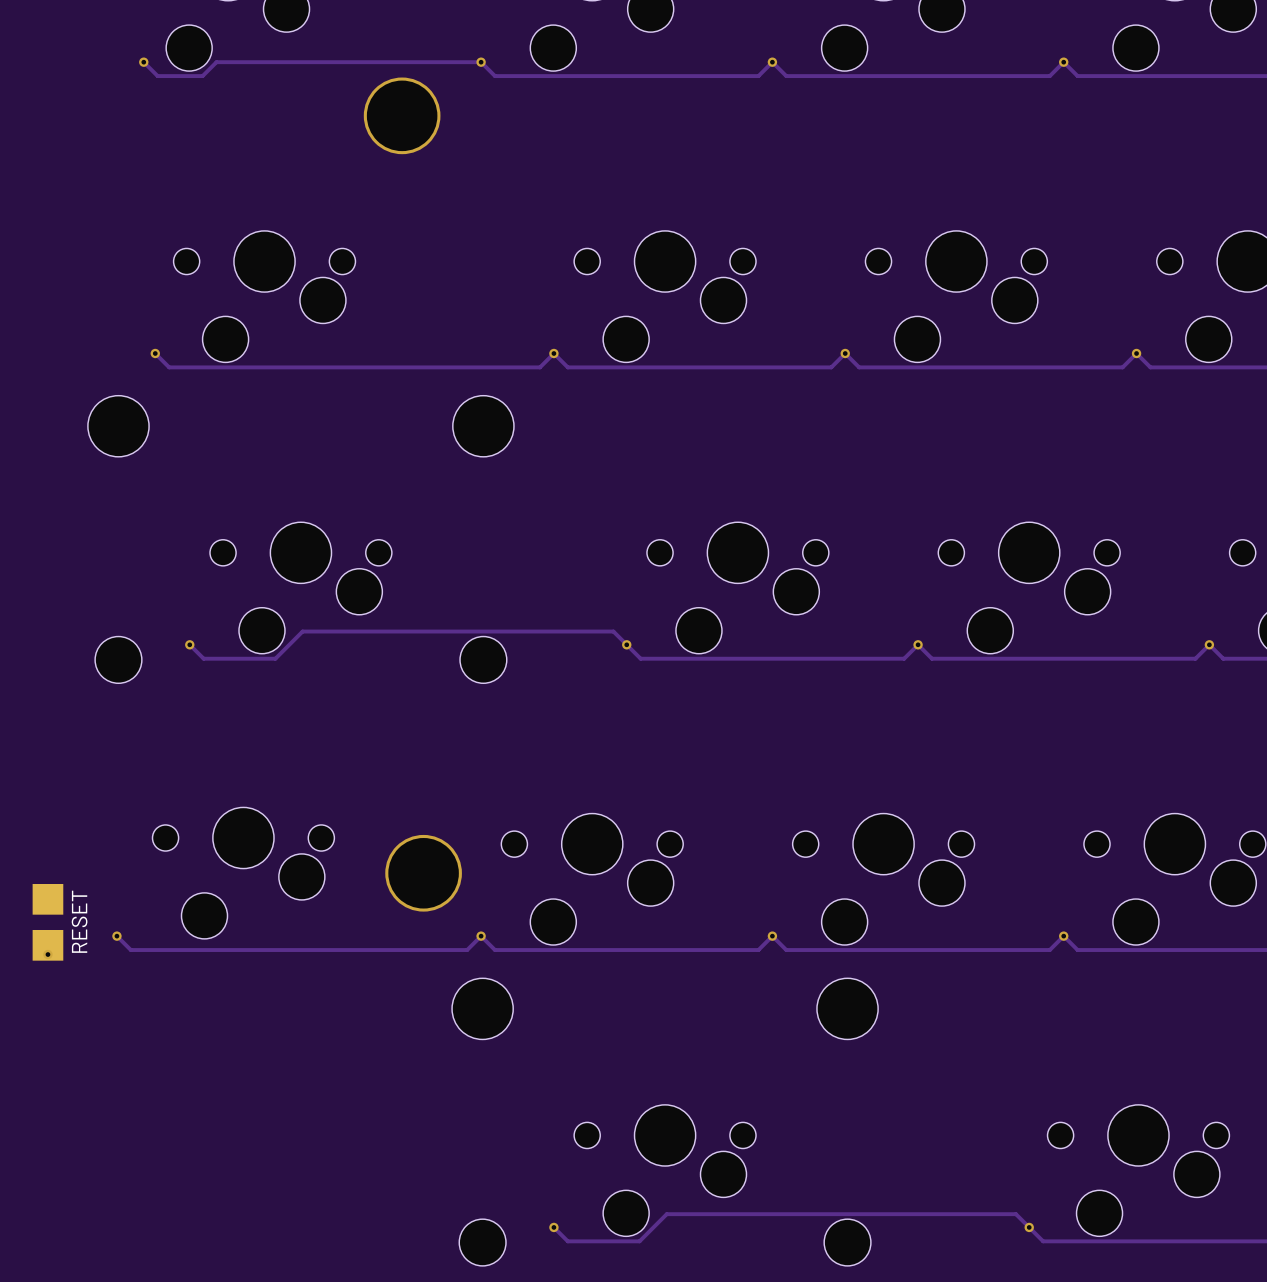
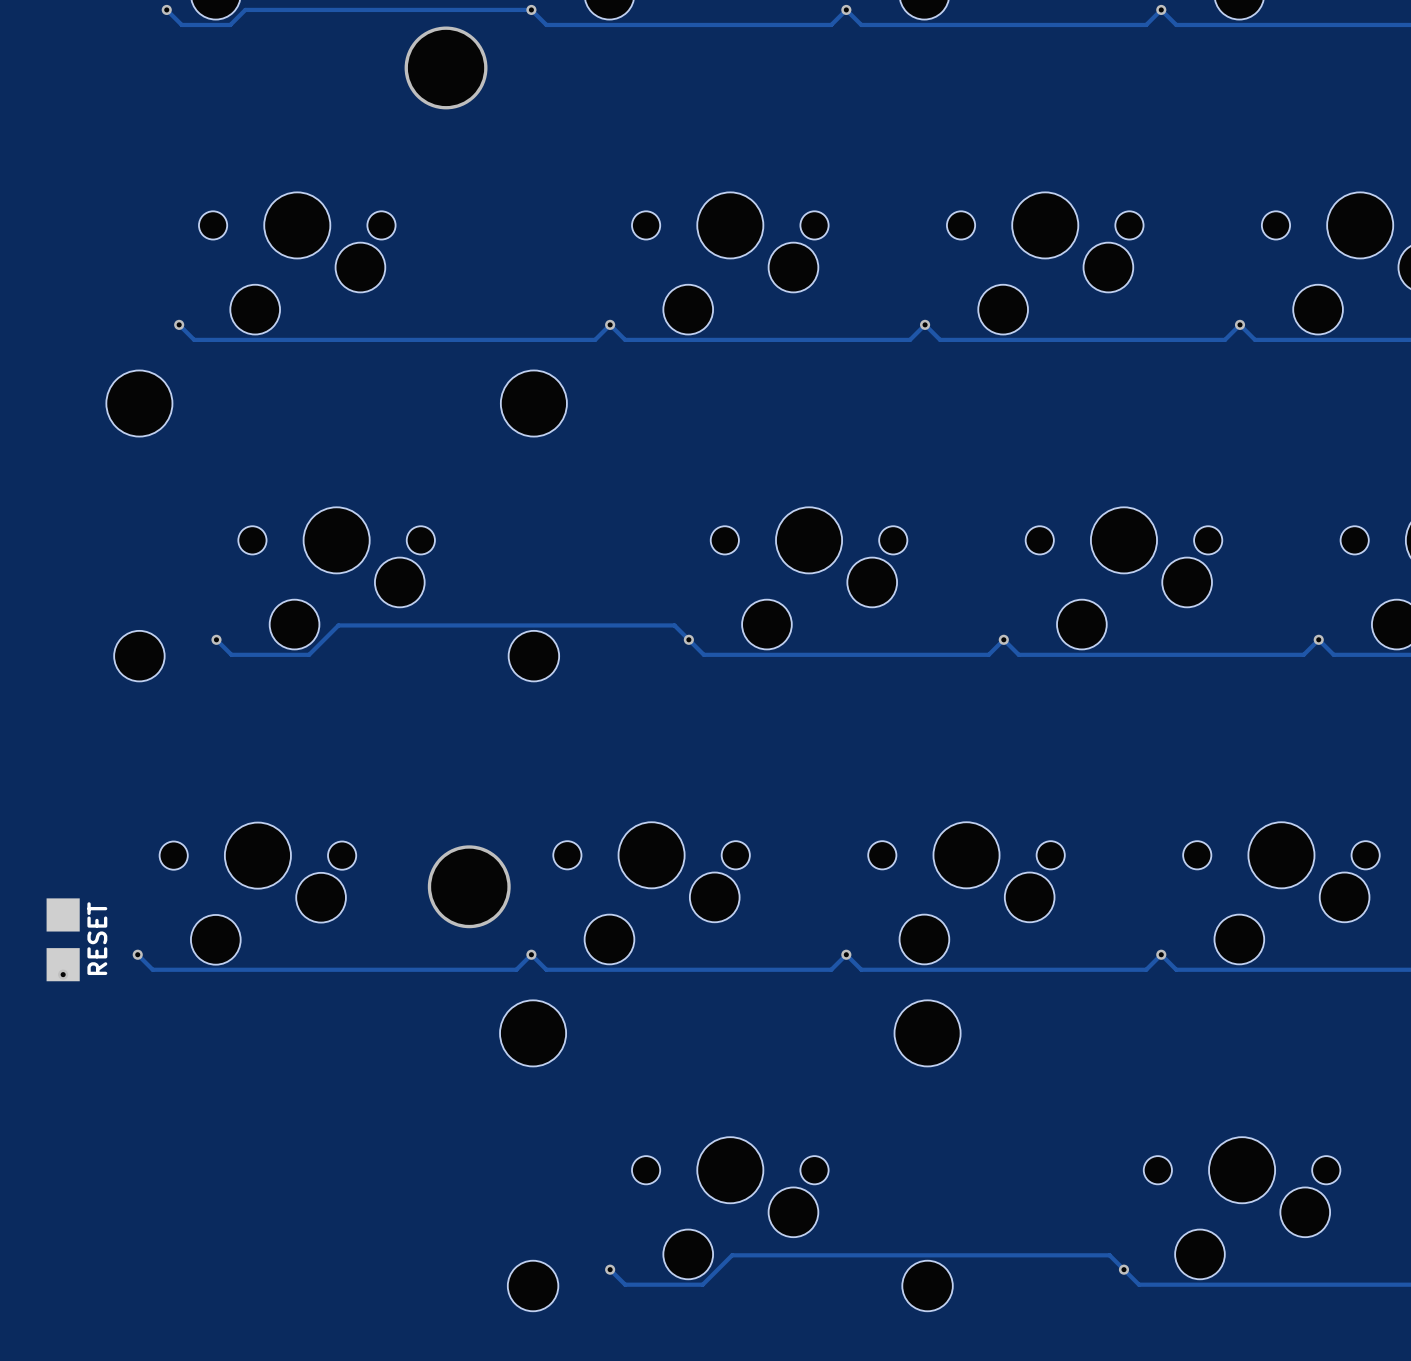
part position: (243, 873) -> (257, 893)

